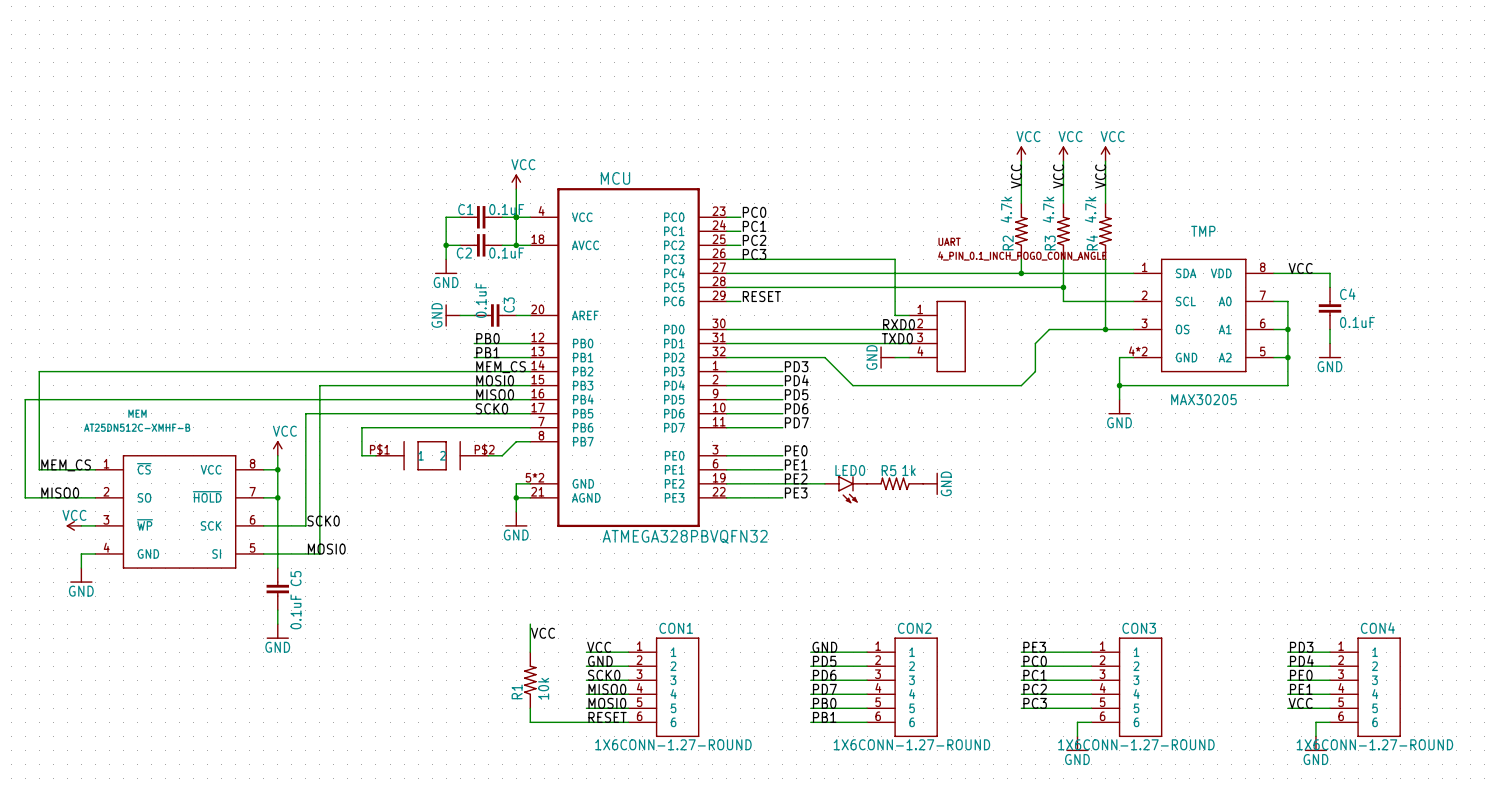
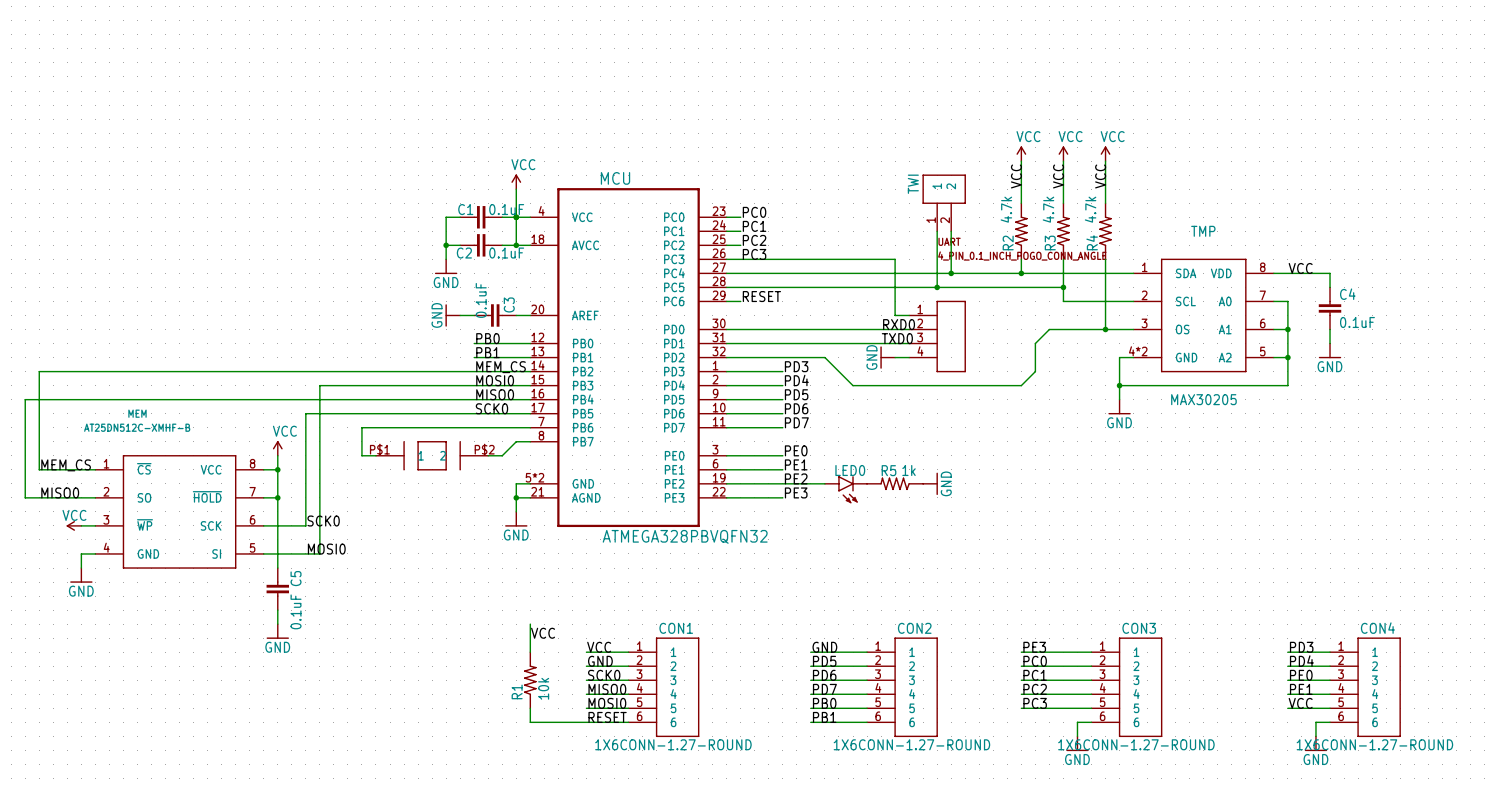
TWI: none -> (944, 202)
wire: none -> (937, 231) (937, 287)
wire: none -> (951, 231) (951, 273)
junction: none -> (951, 273)
junction: none -> (937, 287)

